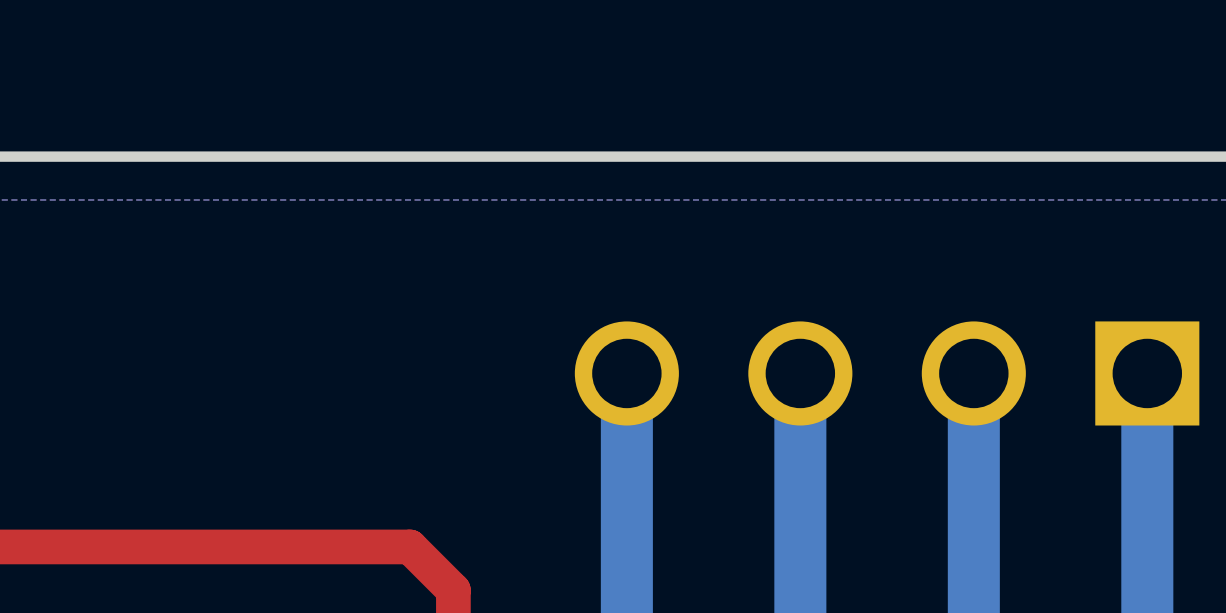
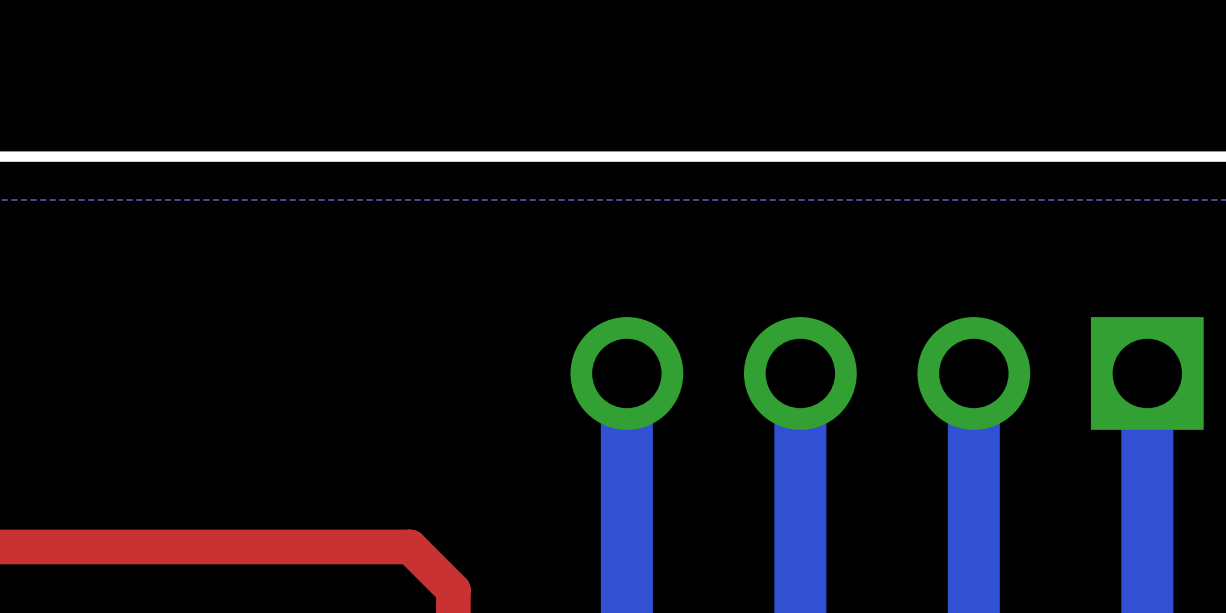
part footprint: [574, 321, 1200, 426] -> [570, 317, 1204, 430]

